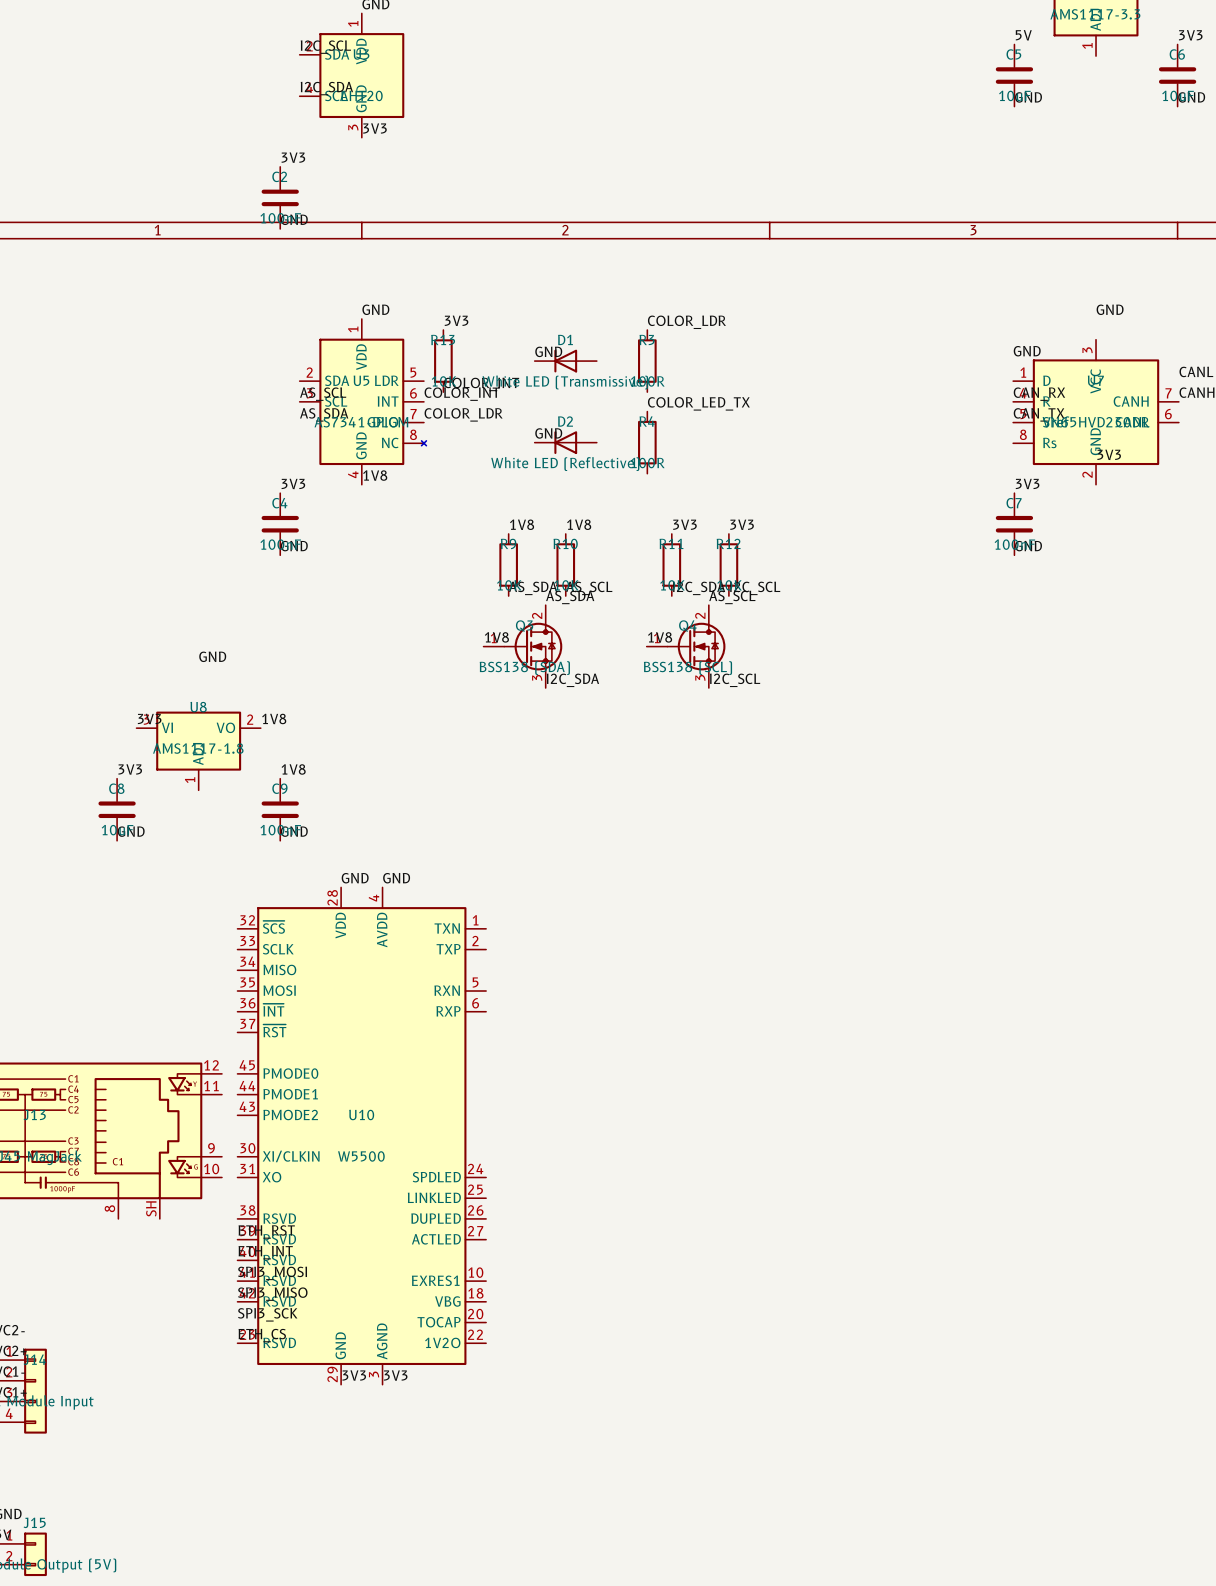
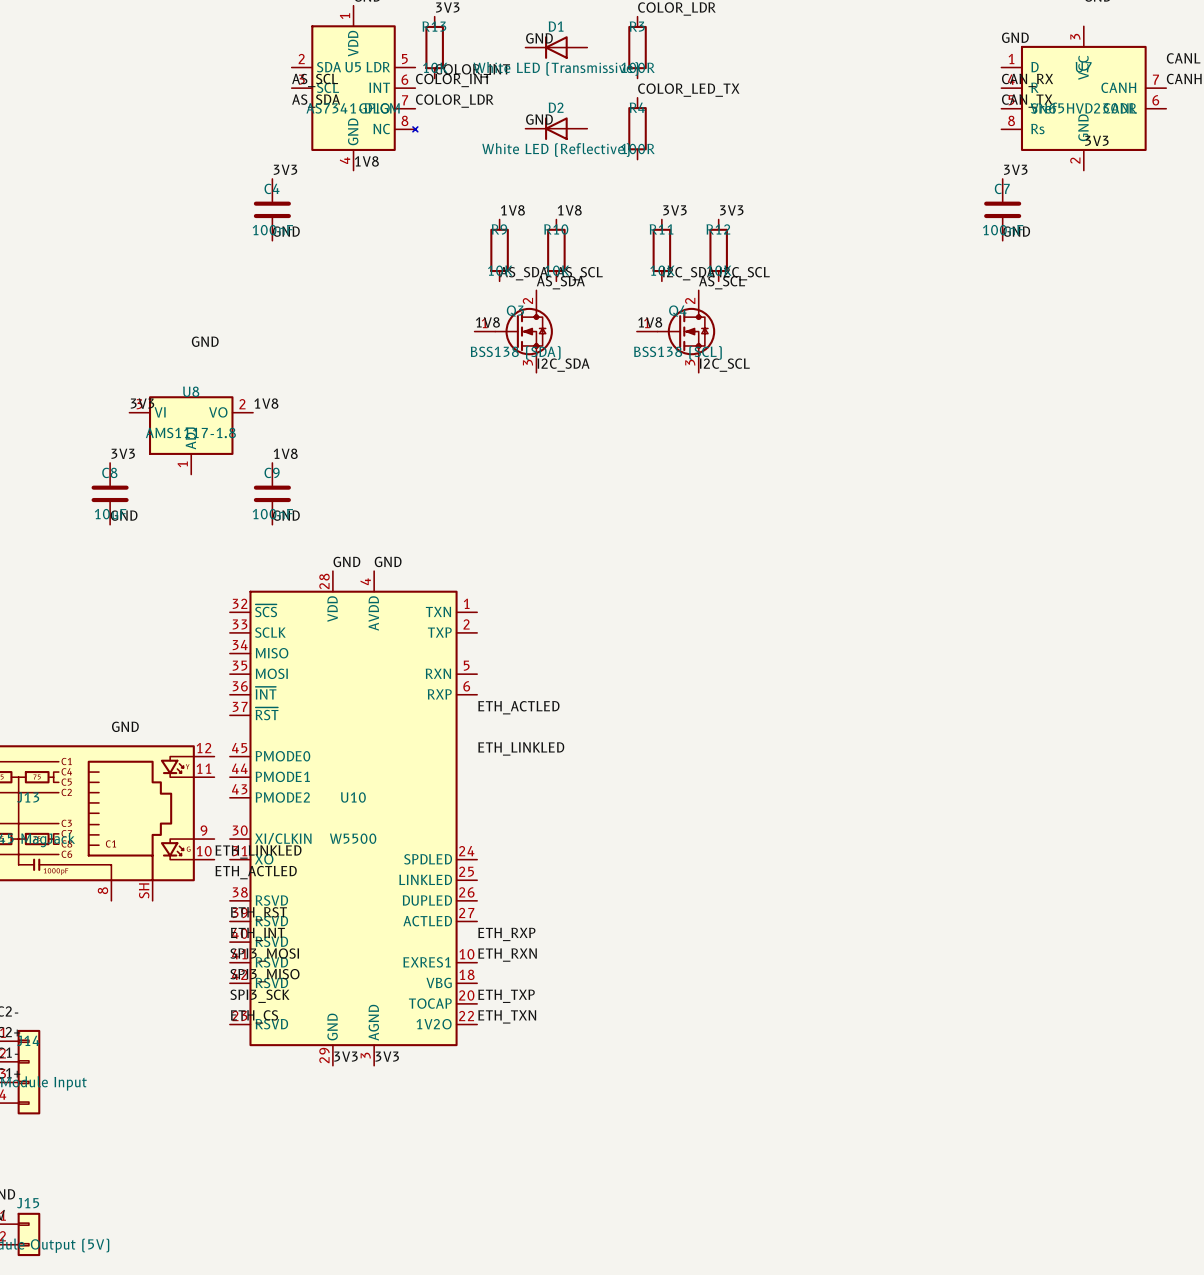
label: none -> ETH_ACTLED (518, 707)
label: none -> GND (125, 726)
label: none -> ETH_LINKLED (521, 748)
label: none -> ETH_LINKLED (258, 851)
label: none -> ETH_ACTLED (256, 872)
label: none -> ETH_RXP (506, 934)
label: none -> ETH_RXN (507, 955)
label: none -> ETH_TXP (506, 996)
label: none -> ETH_TXN (507, 1016)

